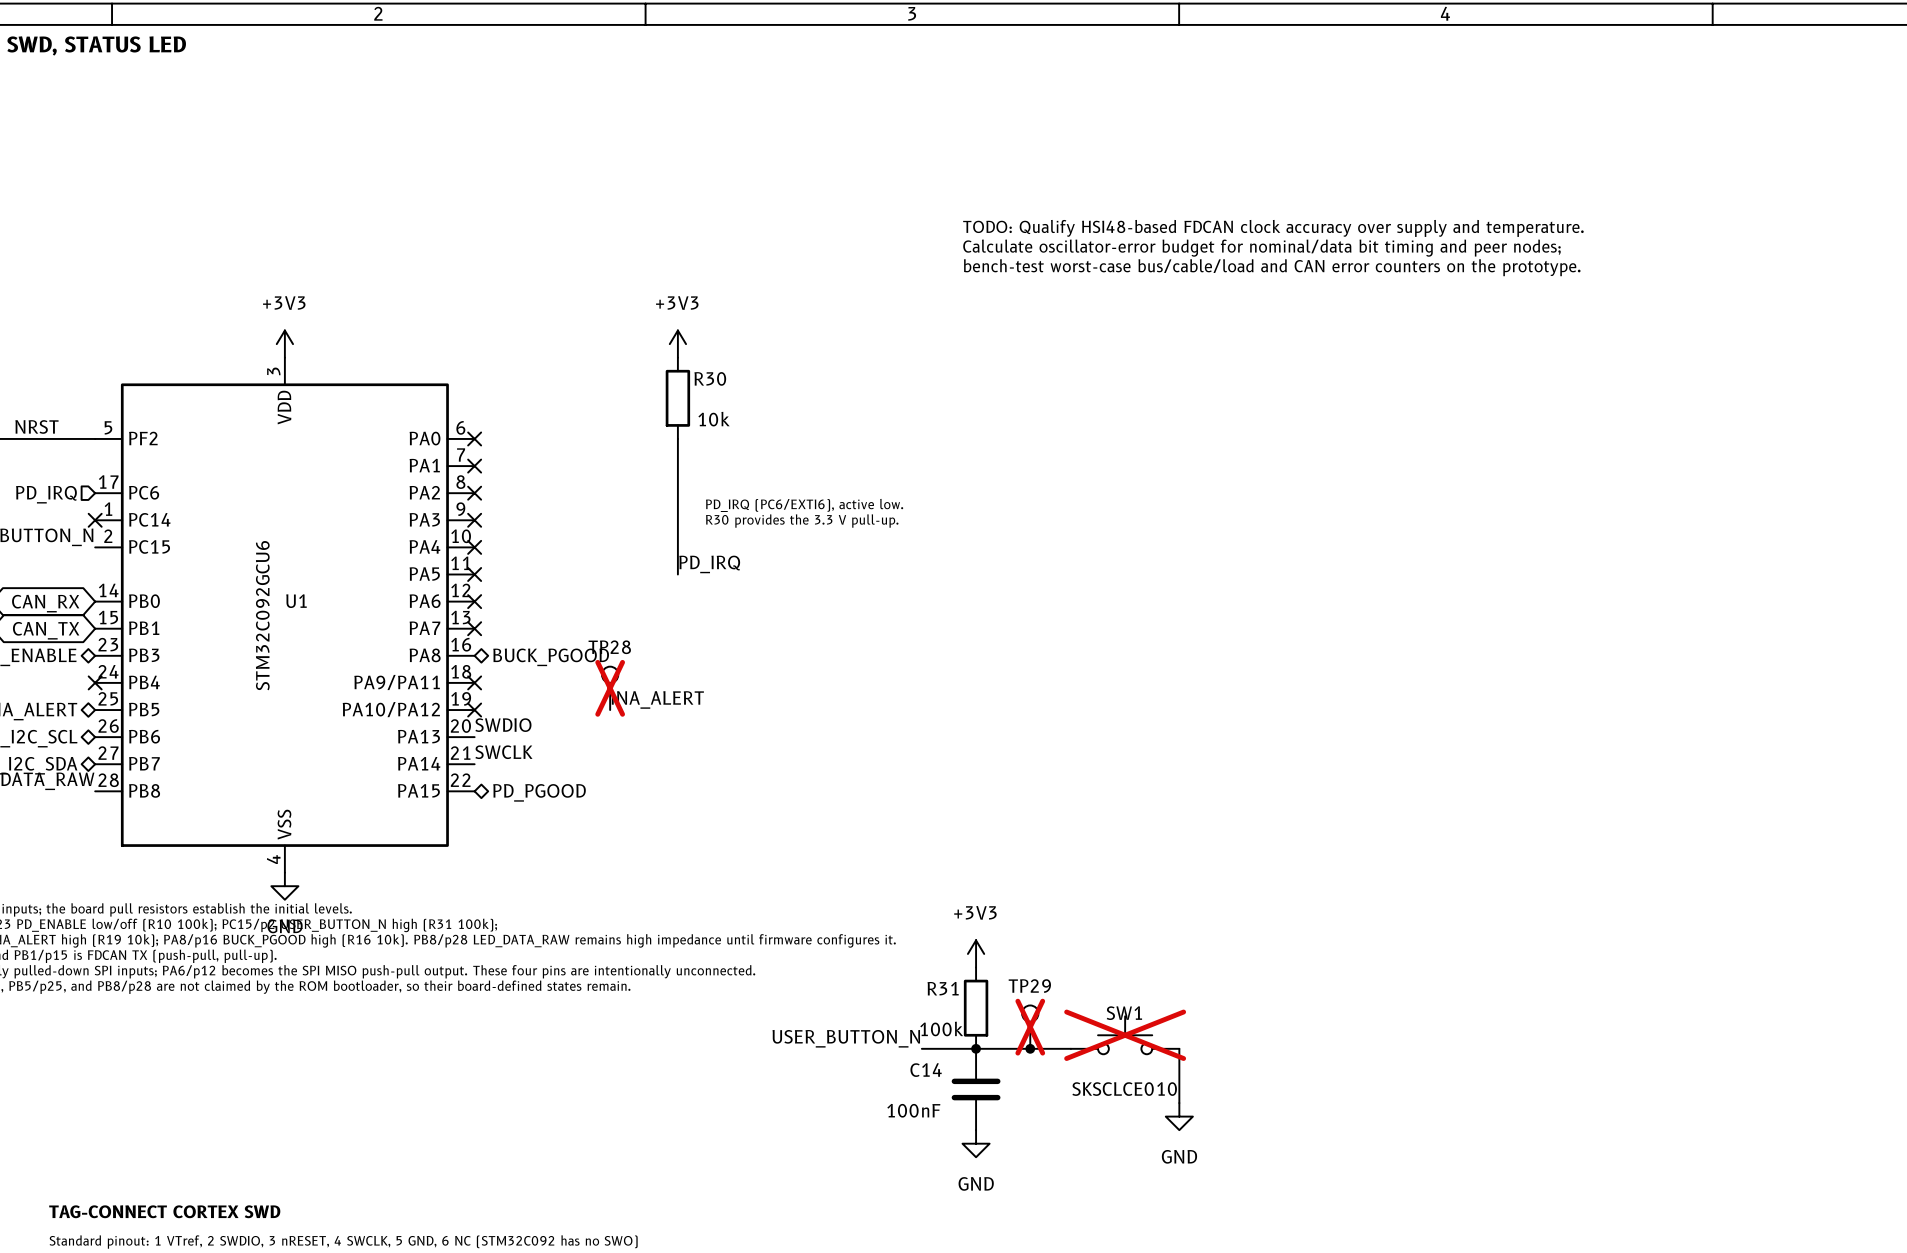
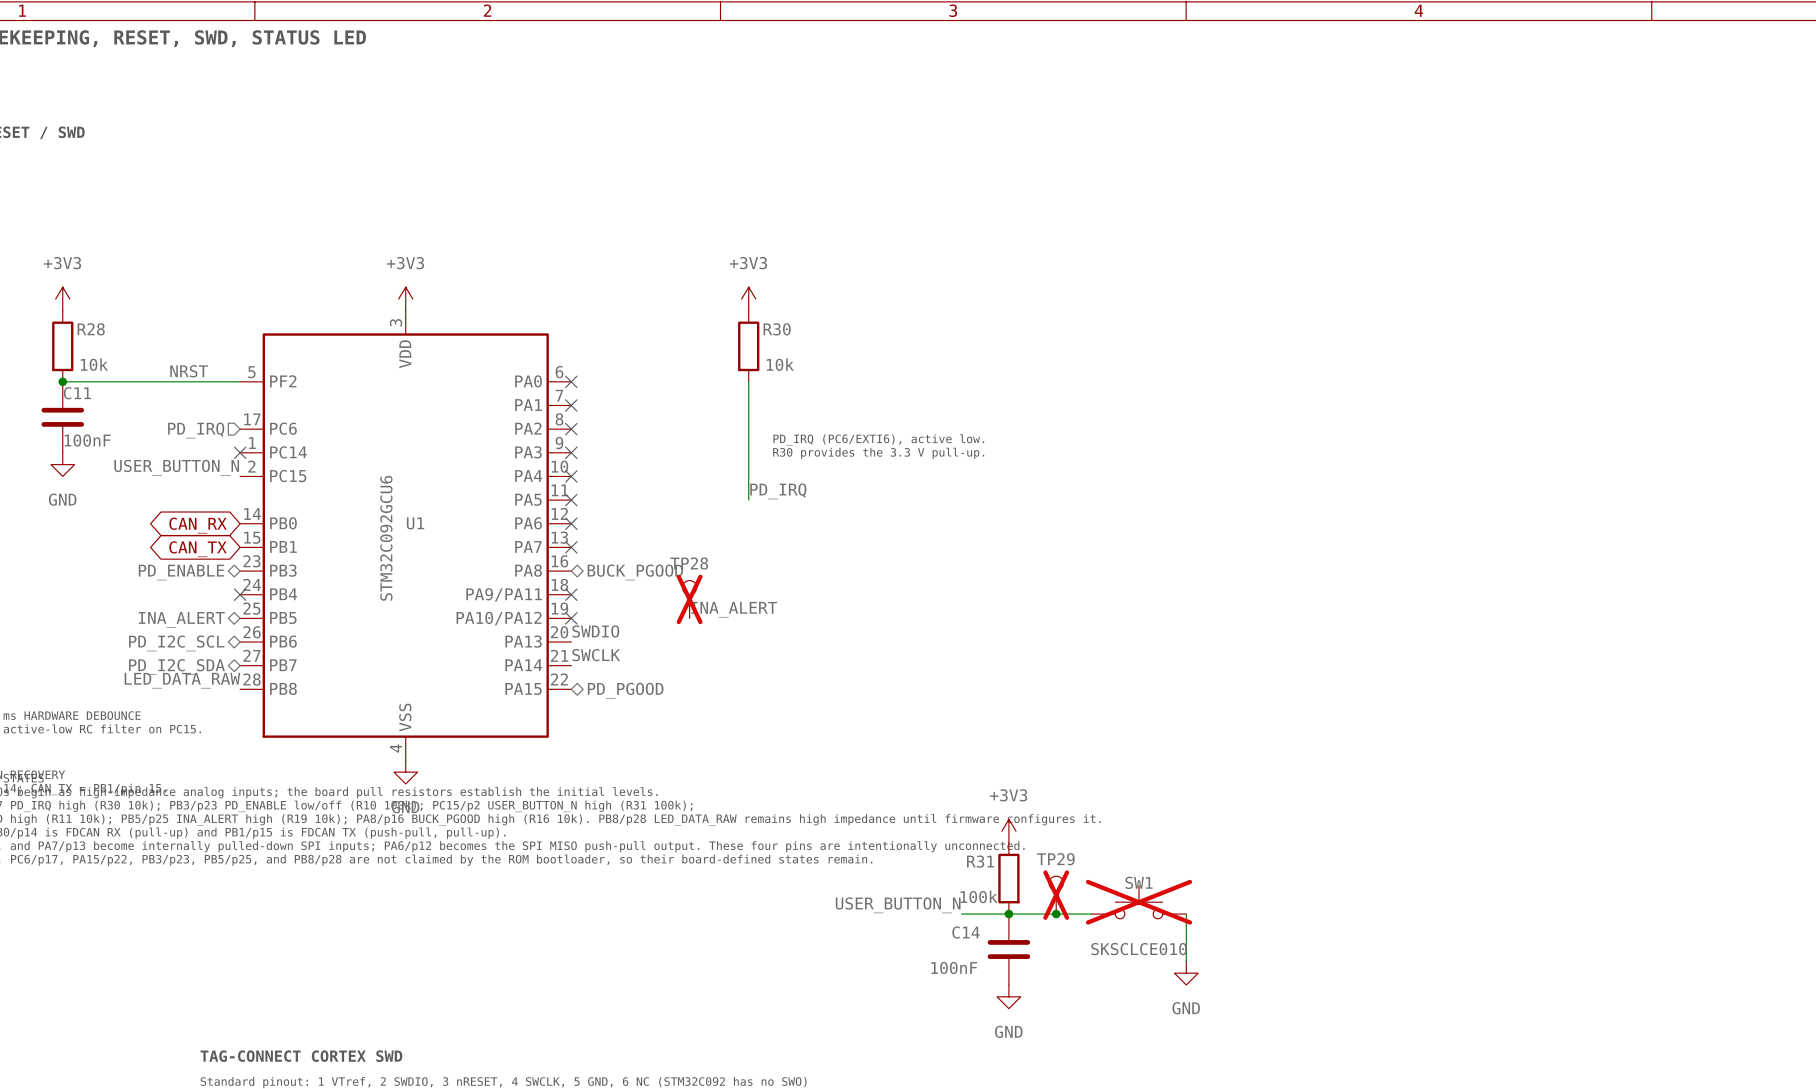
text: TODO: Qualify HSI48-based FDCAN clock accuracy over supply and temperature. (1273, 228) -> none
text: Calculate oscillator-error budget for nominal/data bit timing and peer nodes; (1261, 248) -> none
text: bench-test worst-case bus/cable/load and CAN error counters on the prototype. (1272, 267) -> none

